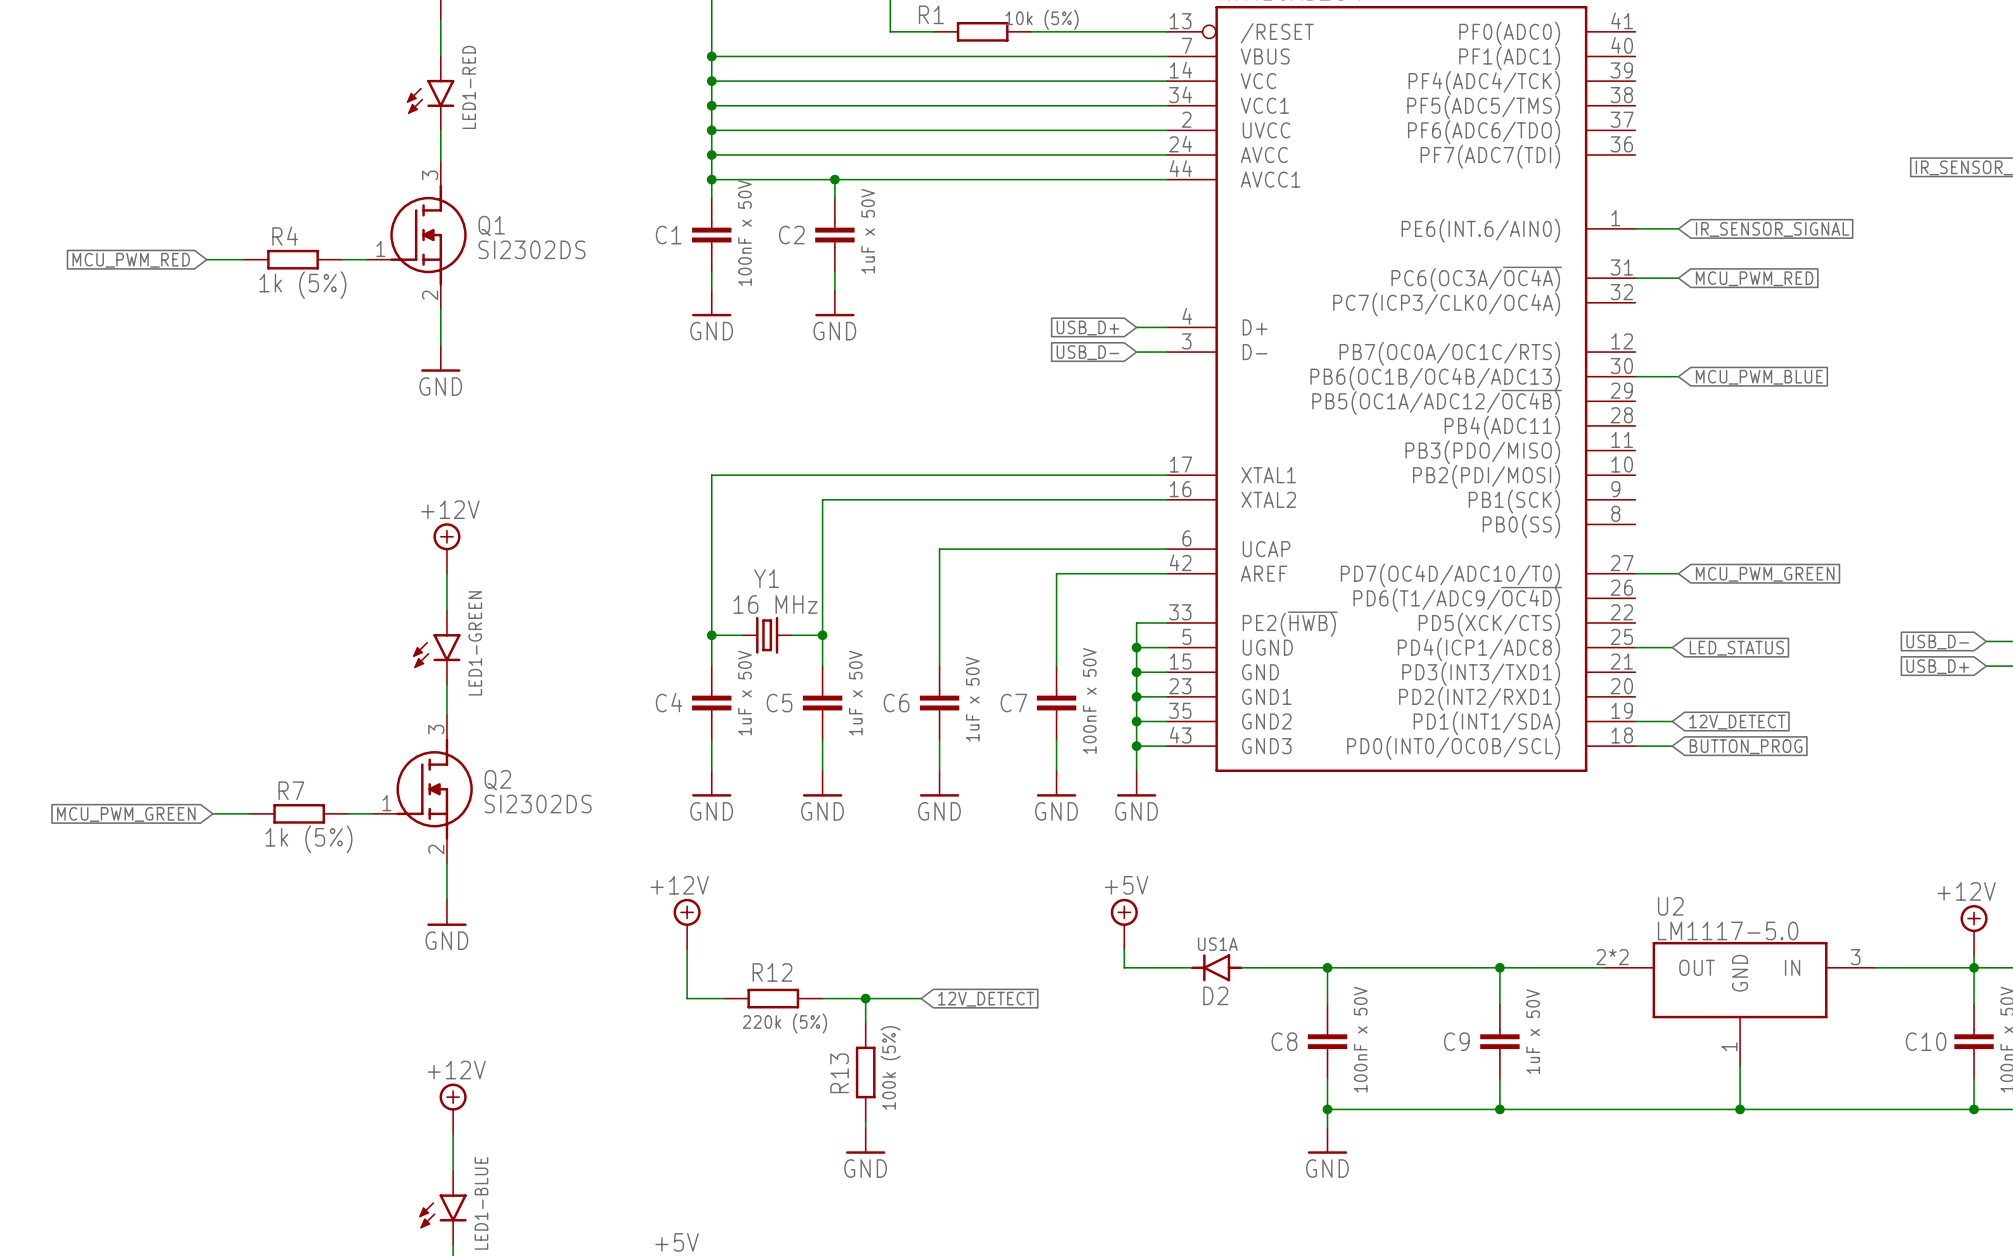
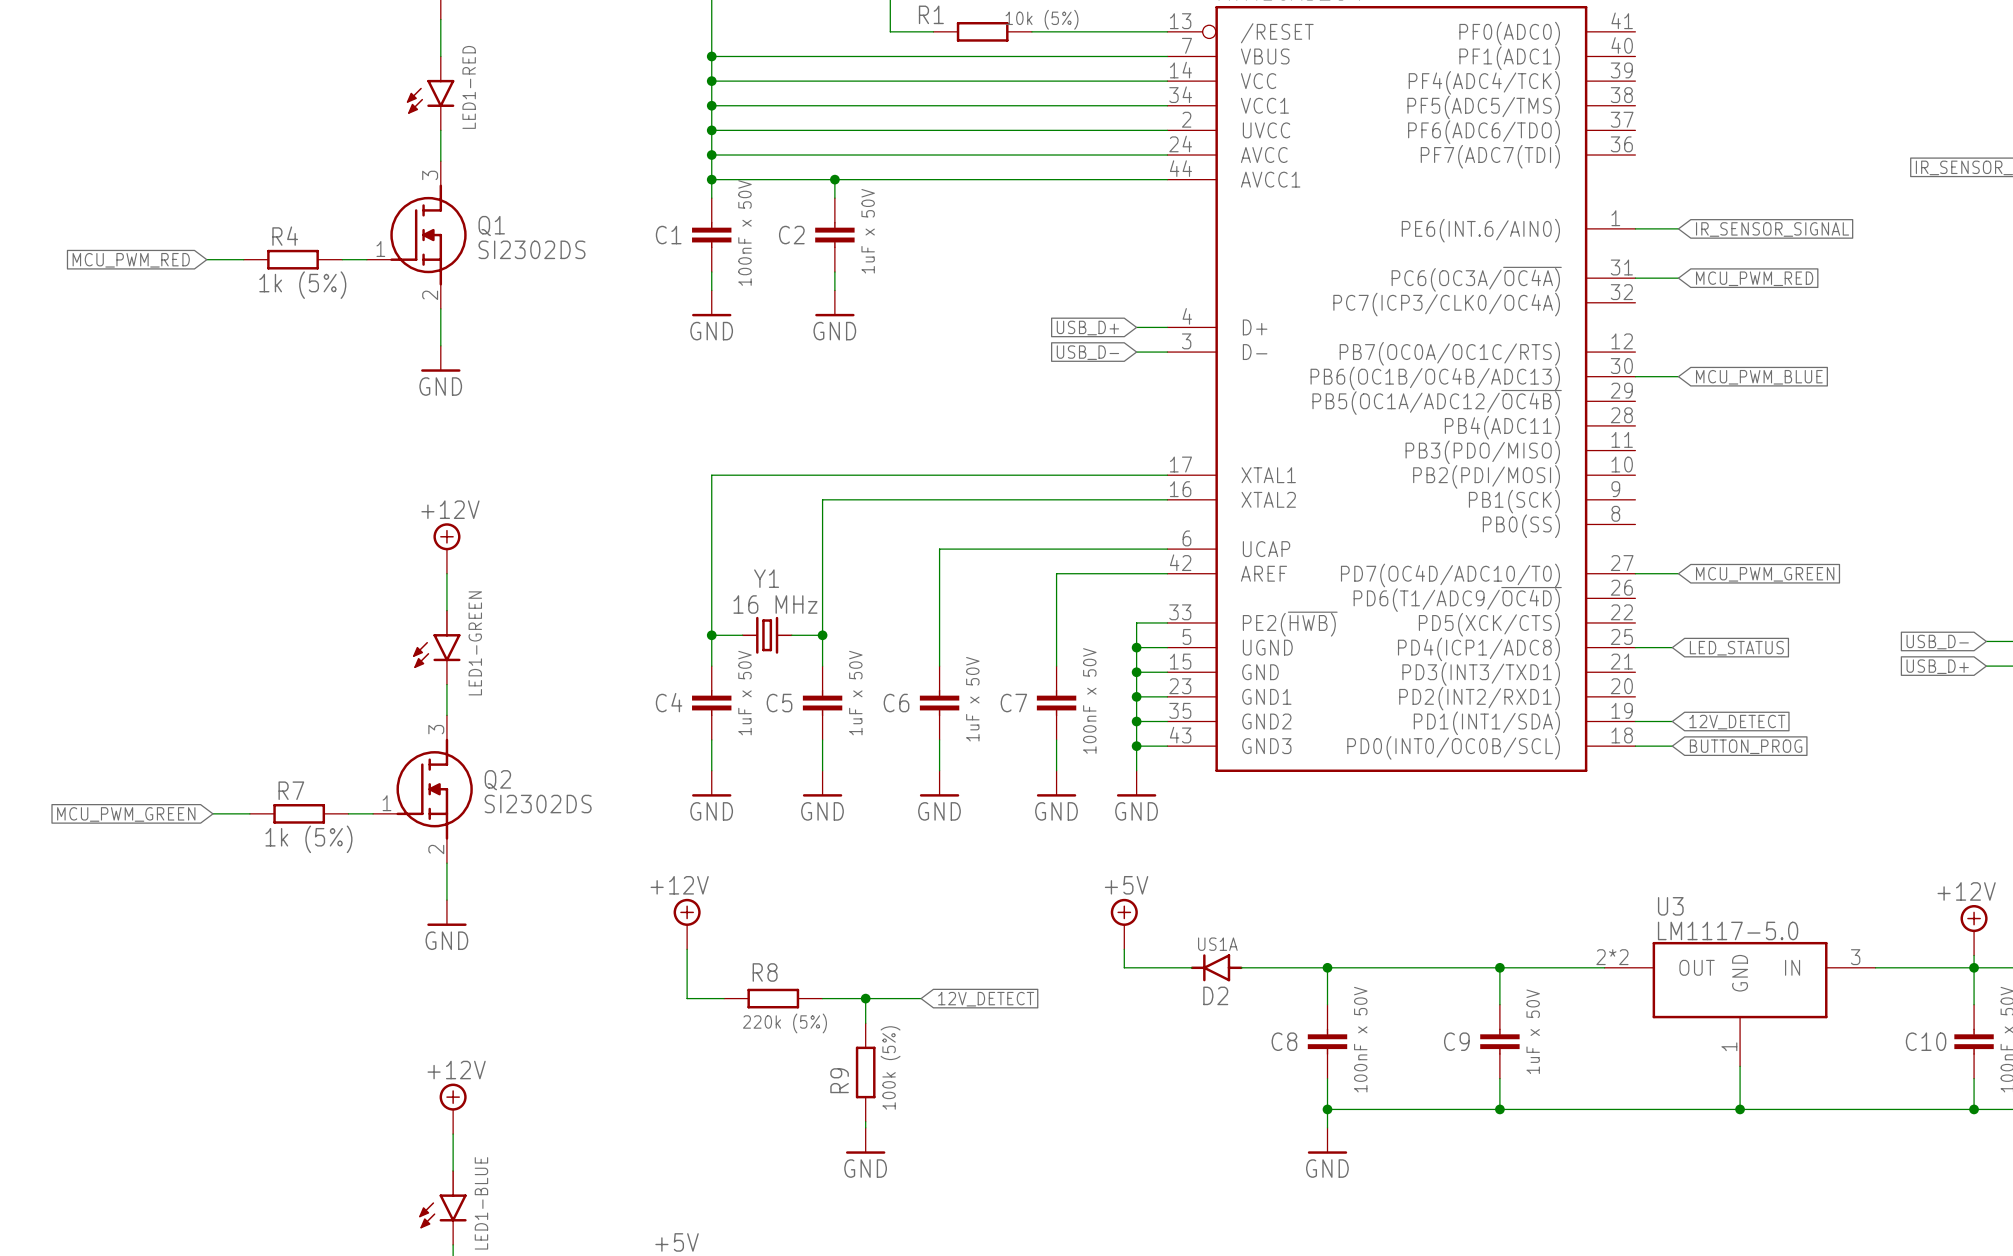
U2 name: U2 (1670, 906) -> U3 (1670, 906)
R12 name: R12 (772, 972) -> R8 (765, 972)
R13 name: R13 (839, 1073) -> R9 (839, 1080)

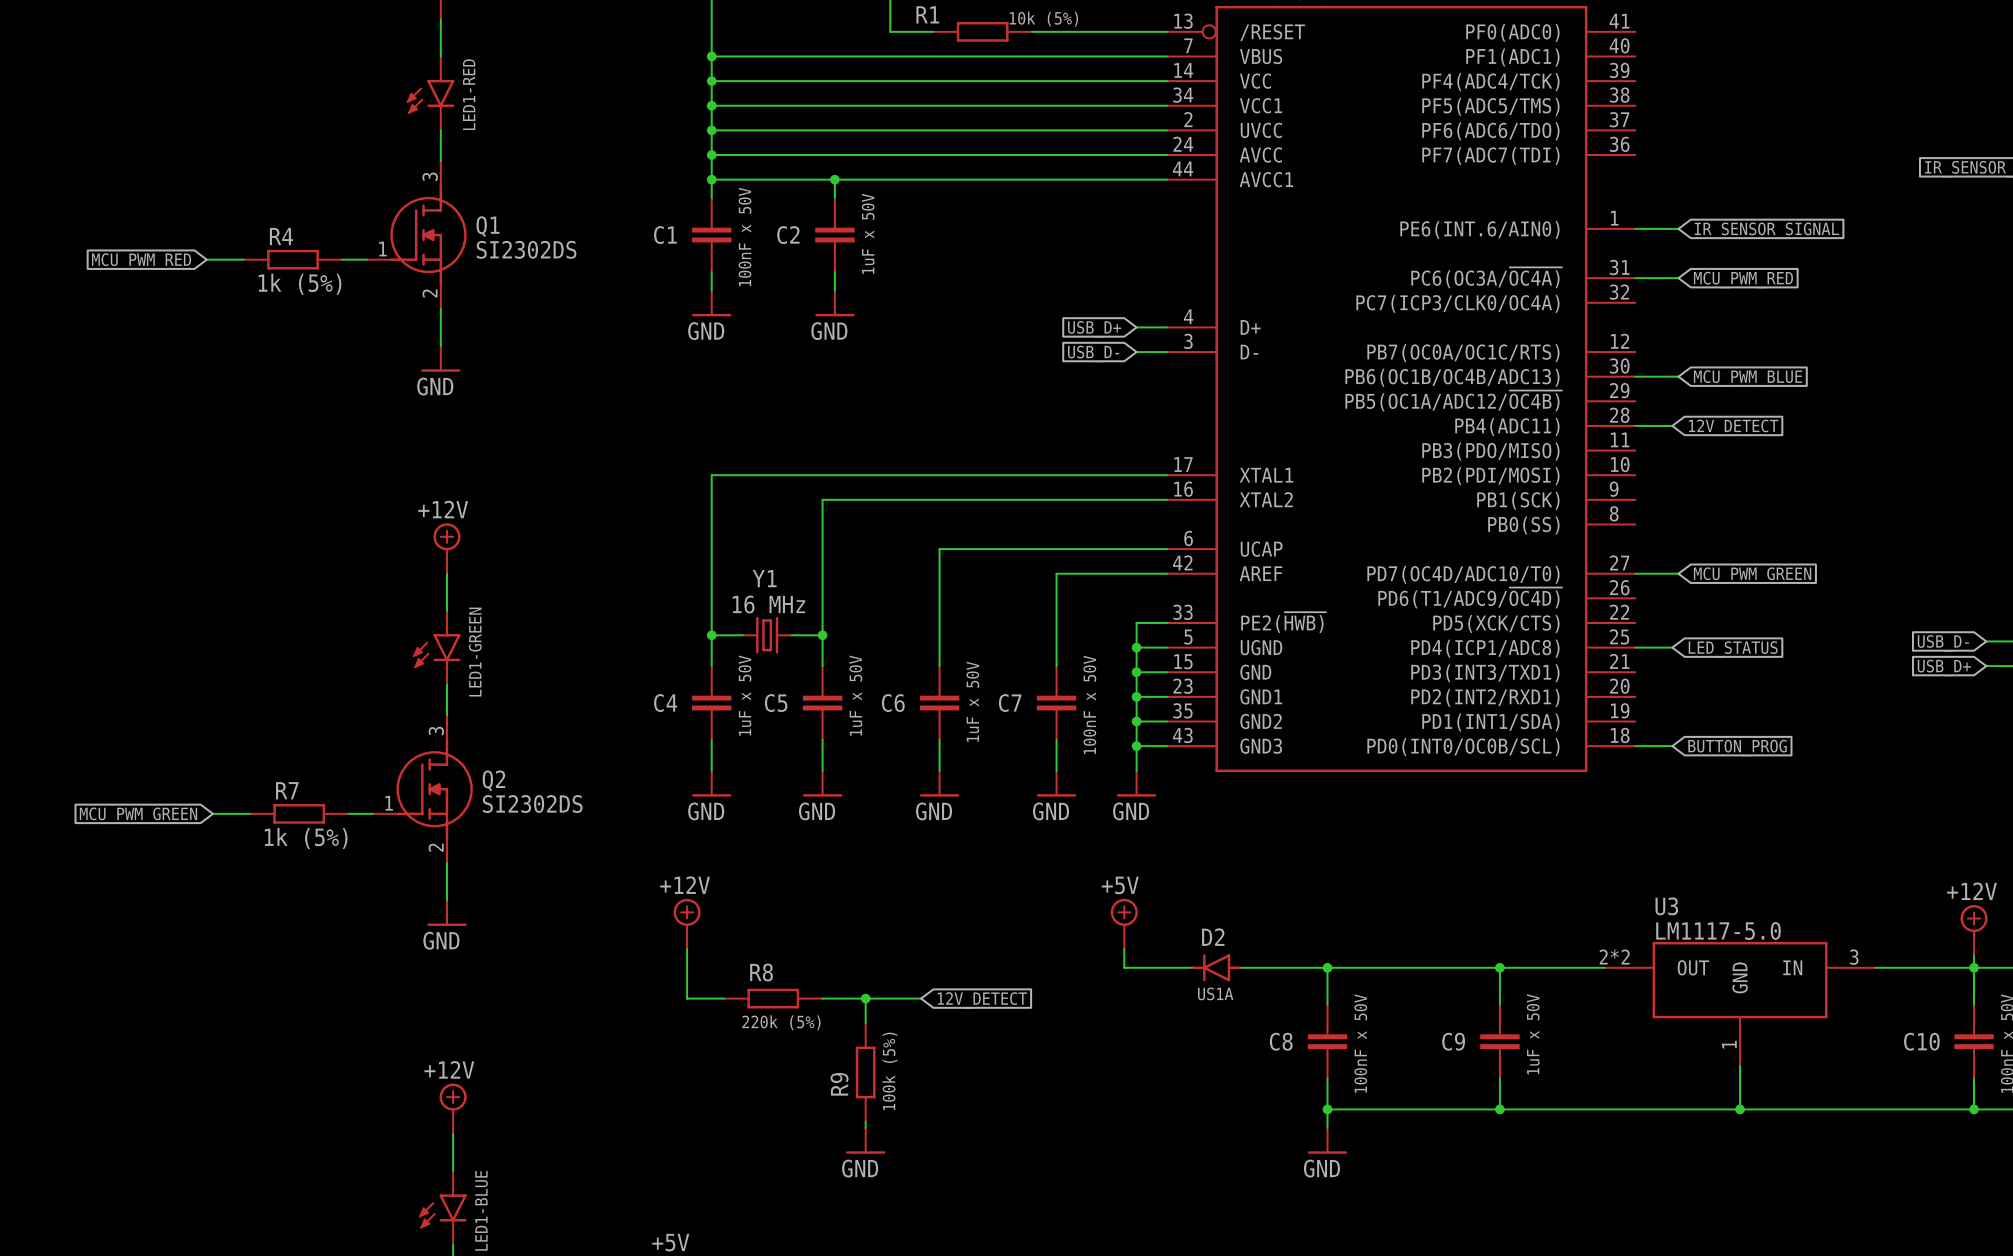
wire: none -> (1635, 425) (1672, 425)
global label: none -> 12V_DETECT (1733, 427)
wire: (1635, 721) (1672, 721) -> none
global label: 12V_DETECT (1737, 722) -> none
D2 value position: US1A (1217, 944) -> US1A (1215, 993)
D2 name position: D2 (1215, 995) -> D2 (1213, 937)

